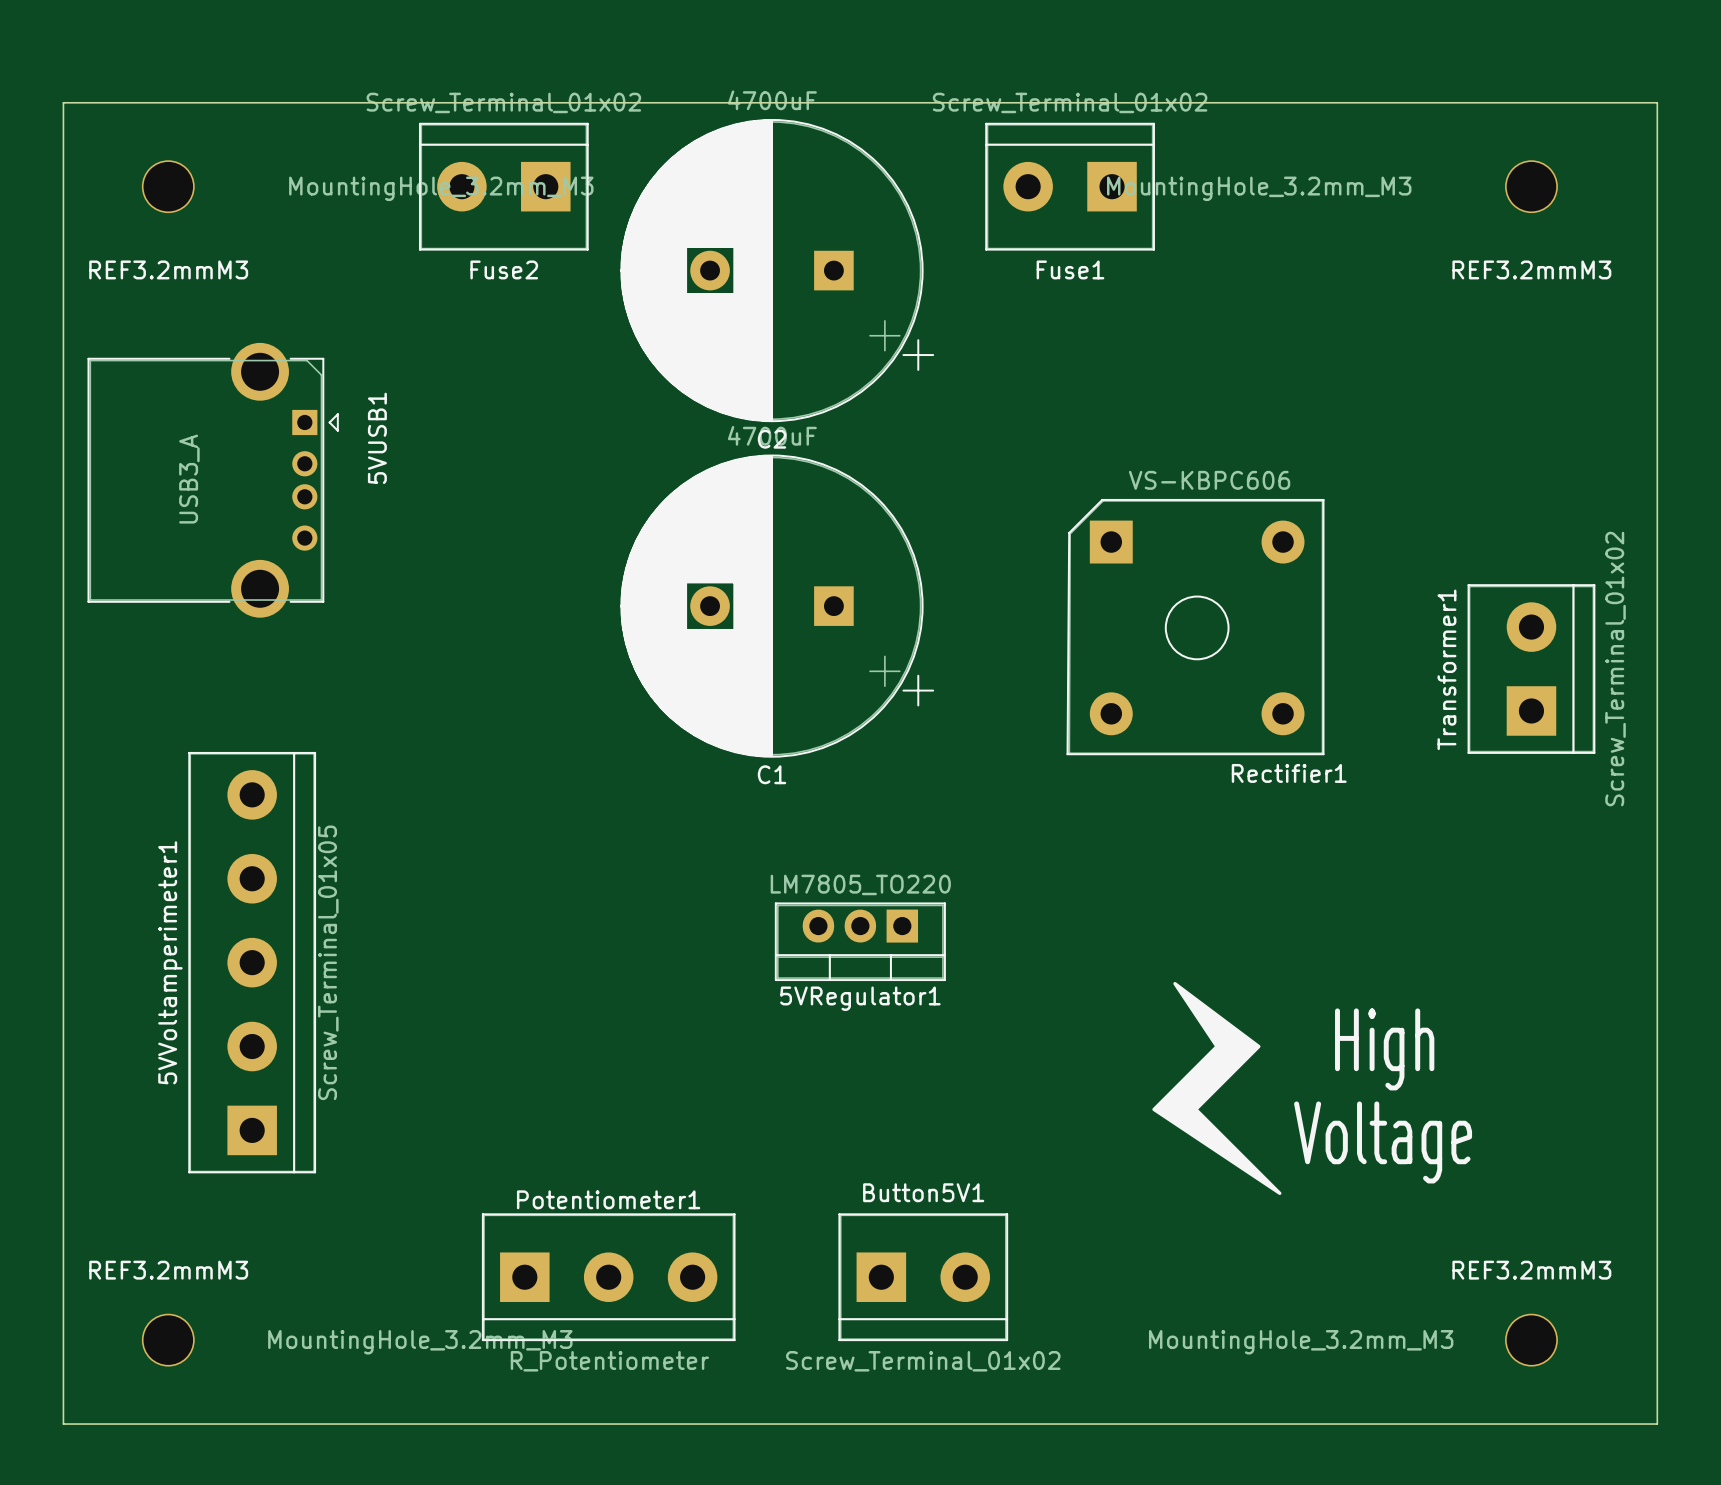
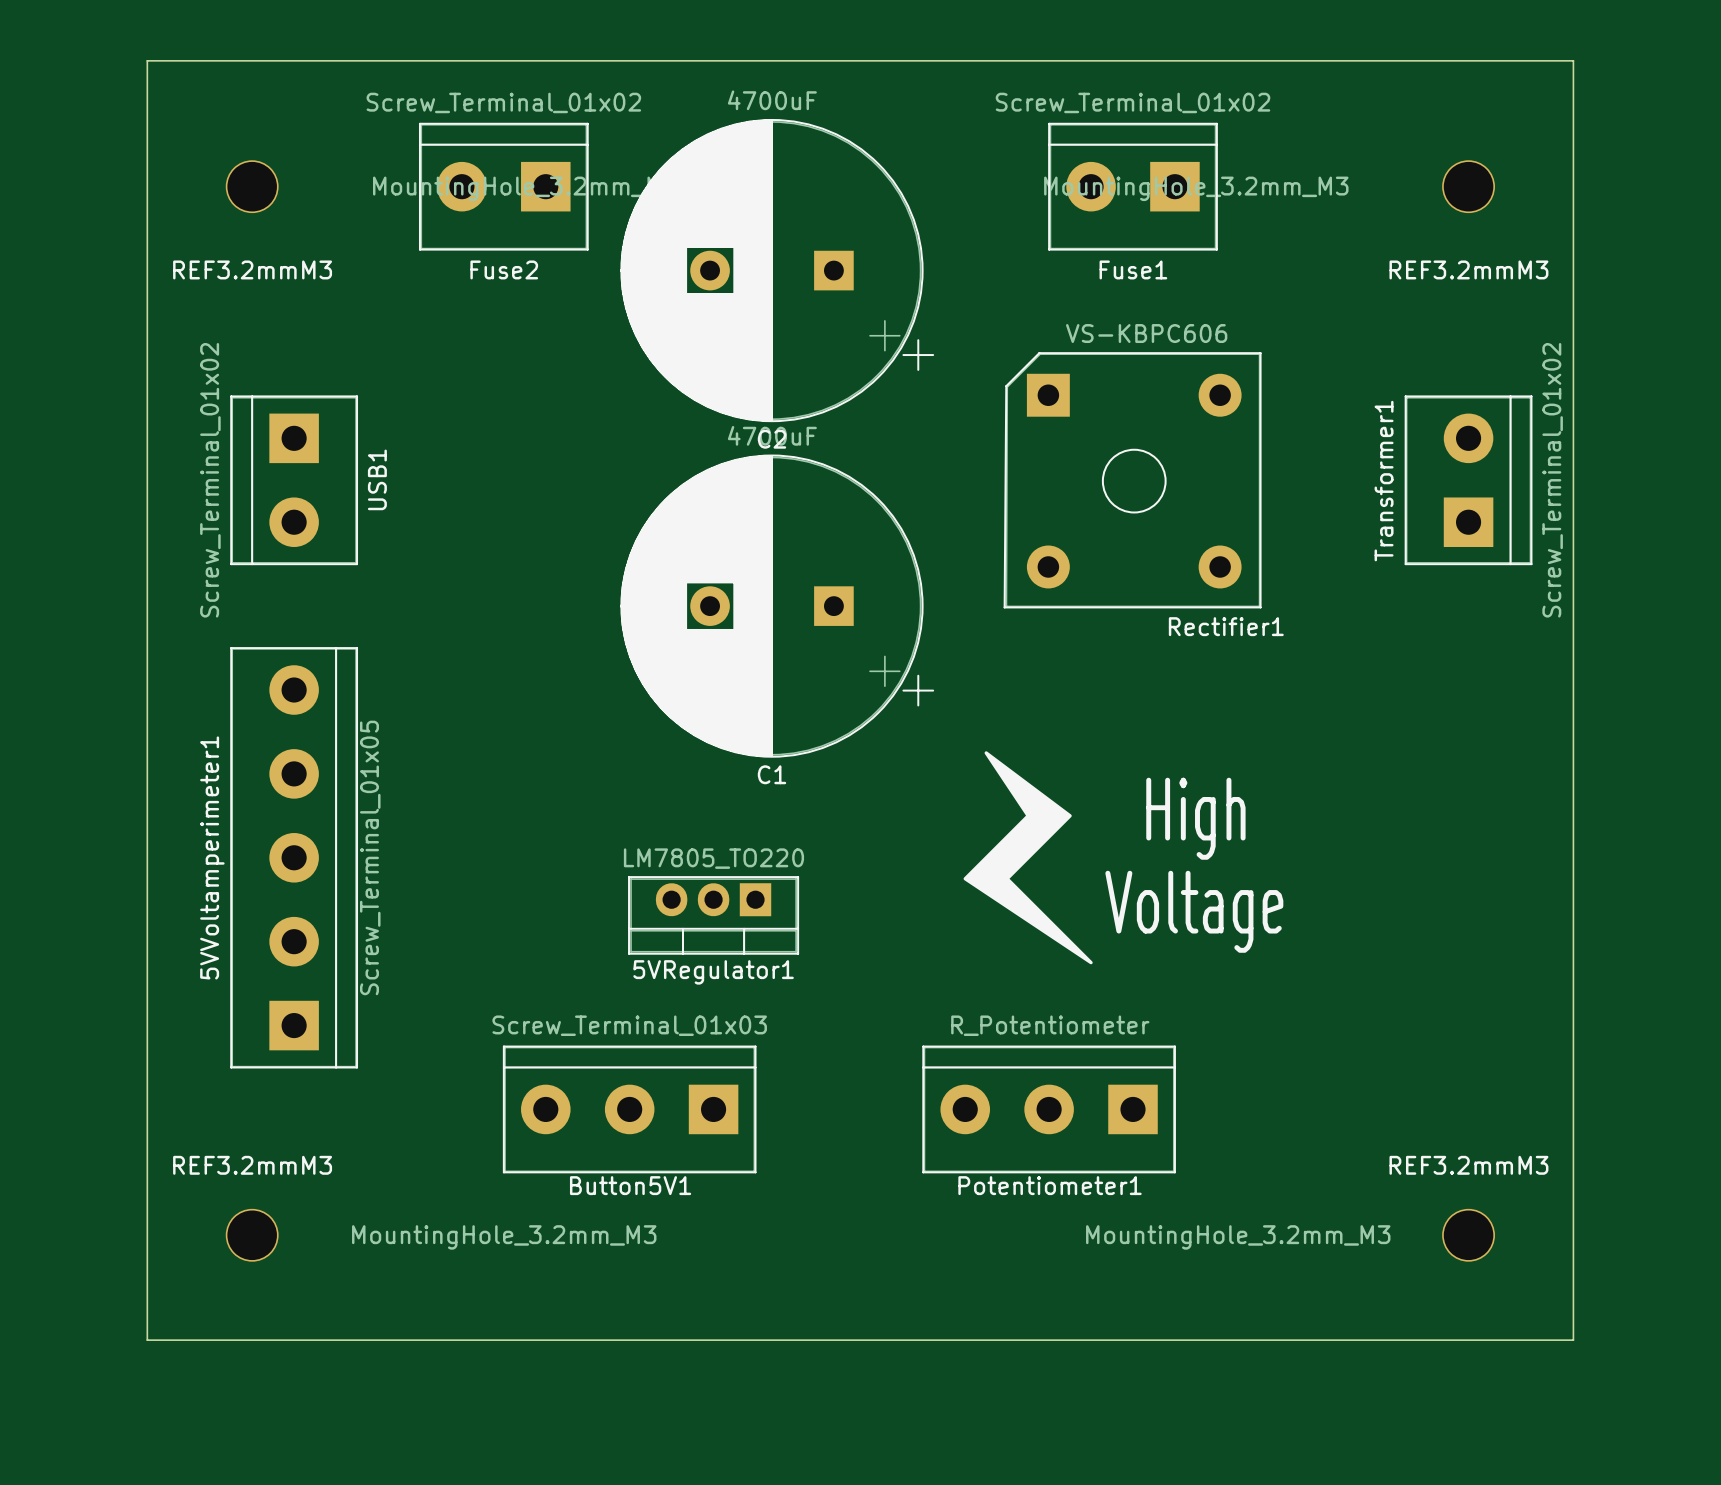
board edge: (63, 102) (63, 1424) (1657, 1424) (1657, 102) (63, 102) -> (147, 60) (147, 1340) (1573, 1340) (1573, 60) (147, 60)
REF3.2mmM3 position: (168, 186) -> (252, 186)
Fuse1 position: (1070, 186) -> (1133, 186)
REF3.2mmM3 position: (1531, 186) -> (1468, 186)
5VUSB1: USB3_A (213, 480) -> none
USB1: none -> Screw_Terminal_01x02 (294, 480)
Rectifier1 position: (1195, 627) -> (1132, 480)
Transformer1 position: (1531, 669) -> (1468, 480)
5VRegulator1 position: (860, 941) -> (713, 915)
5VVoltamperimeter1 position: (252, 962) -> (294, 857)
text position: High (1384, 1049) -> High (1195, 818)
drawing position: (1216, 1088) -> (1028, 857)
text position: Voltage (1383, 1142) -> Voltage (1194, 911)
Button5V1 name position: Button5V1 (923, 1192) -> Button5V1 (630, 1185)
Button5V1 footprint: [838, 1213, 1009, 1342] -> [502, 1045, 757, 1174]
Potentiometer1 rotation: 0° (608, 1277) -> 180° (1049, 1109)
Potentiometer1 position: (608, 1277) -> (1049, 1109)
REF3.2mmM3 position: (168, 1340) -> (252, 1235)
REF3.2mmM3 position: (1531, 1340) -> (1468, 1235)
Button5V1 value: Screw_Terminal_01x02 (923, 1361) -> Screw_Terminal_01x03 (629, 1025)

